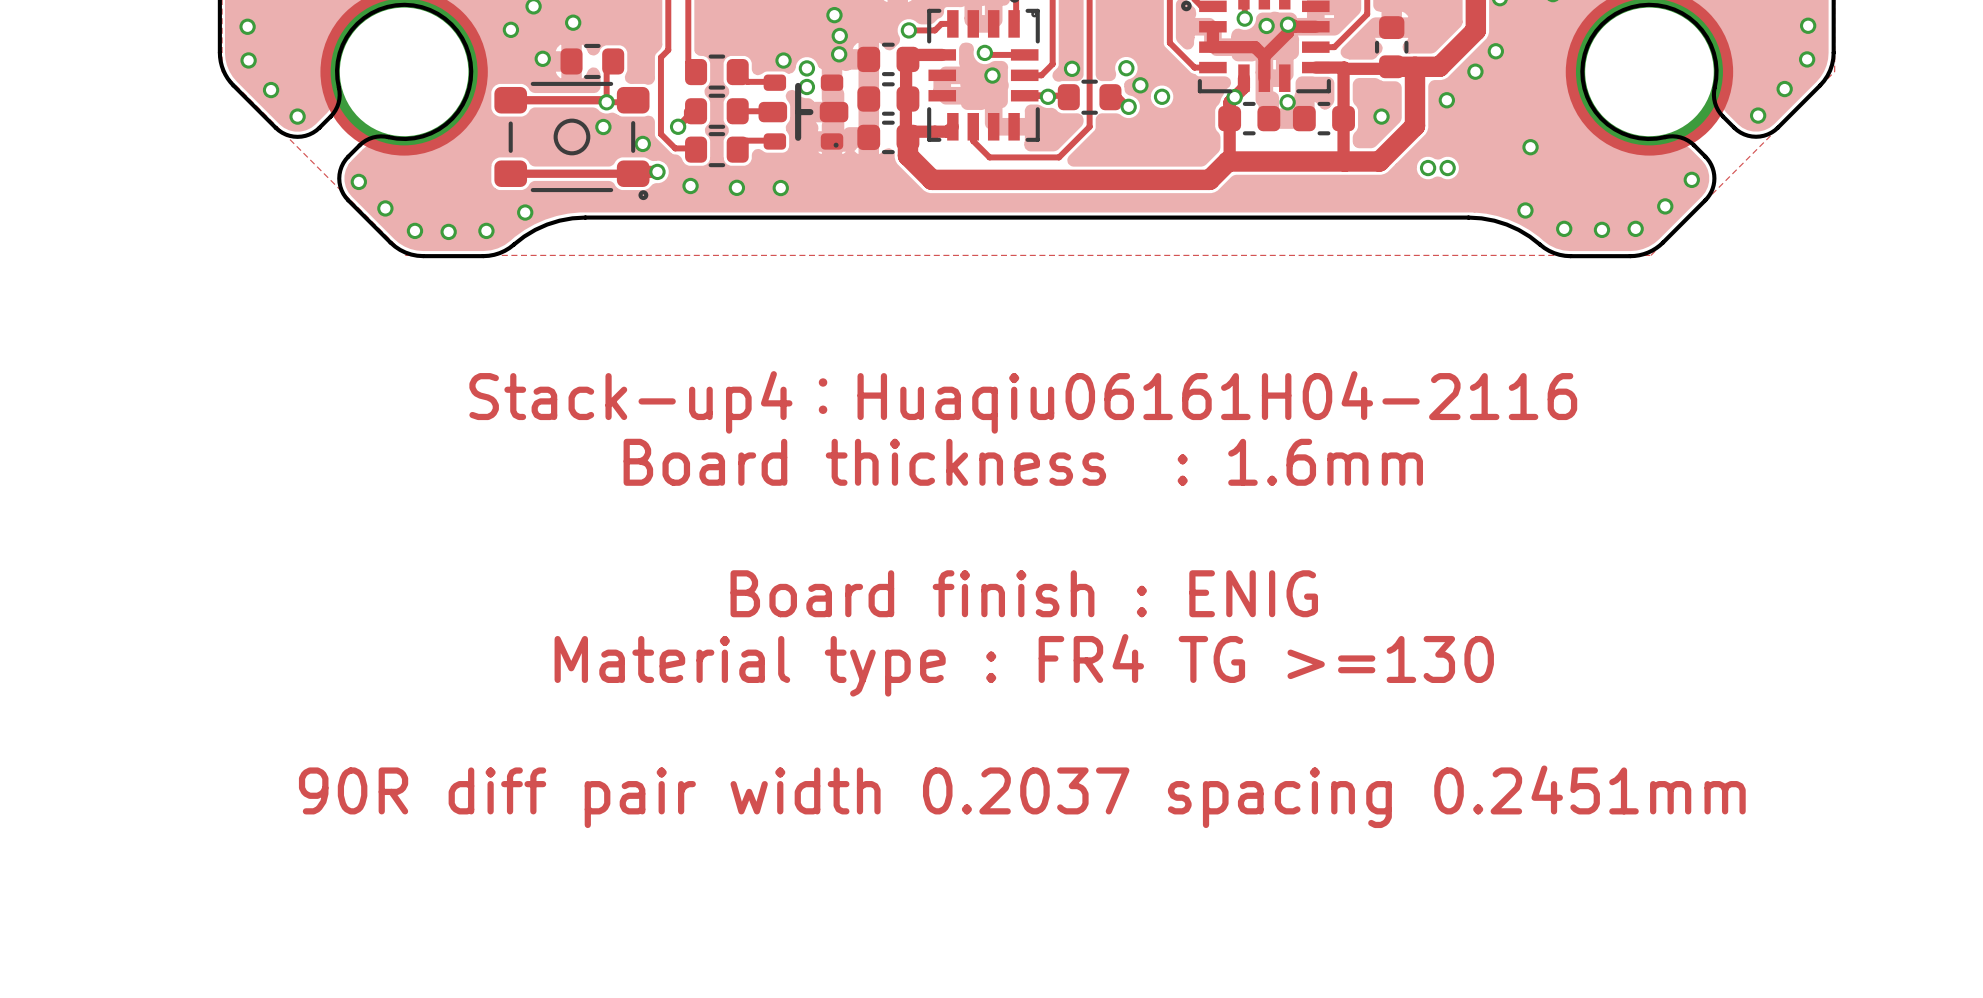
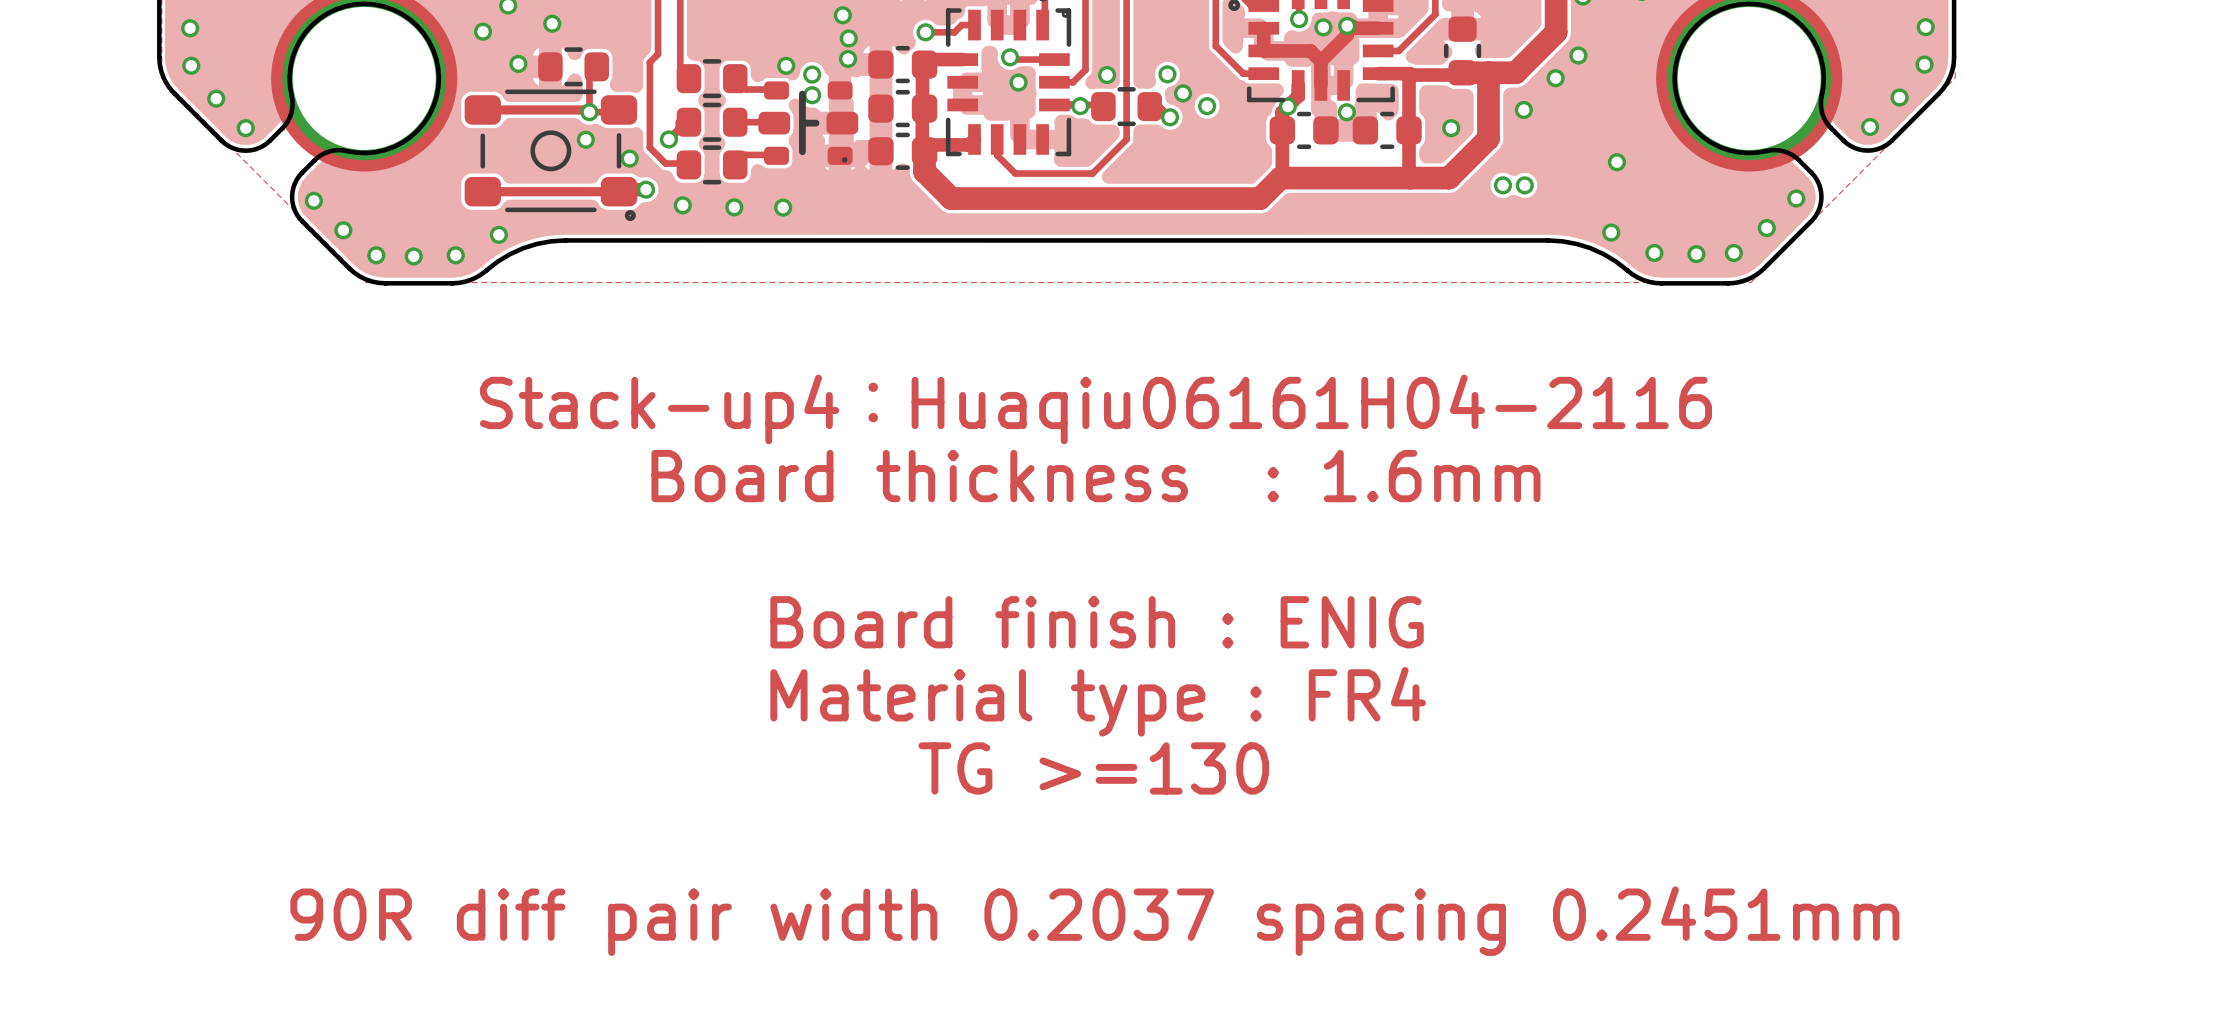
text position: Stack-up4：Huaqiu06161H04-2116 (1023, 402) -> Stack-up4：Huaqiu06161H04-2116 (1095, 409)
text position: Board thickness : 1.6mm (1023, 462) -> Board thickness : 1.6mm (1095, 476)
text position: Board finish : ENIG (1024, 593) -> Board finish : ENIG (1097, 622)
text: Material type : FR4 TG >=130 (1024, 665) -> Material type : FR4 (1098, 701)
text: none -> TG >=130 (1093, 768)
text position: 90R diff pair width 0.2037 spacing 0.2451mm (1022, 796) -> 90R diff pair width 0.2037 spacing 0.2451mm (1094, 921)

